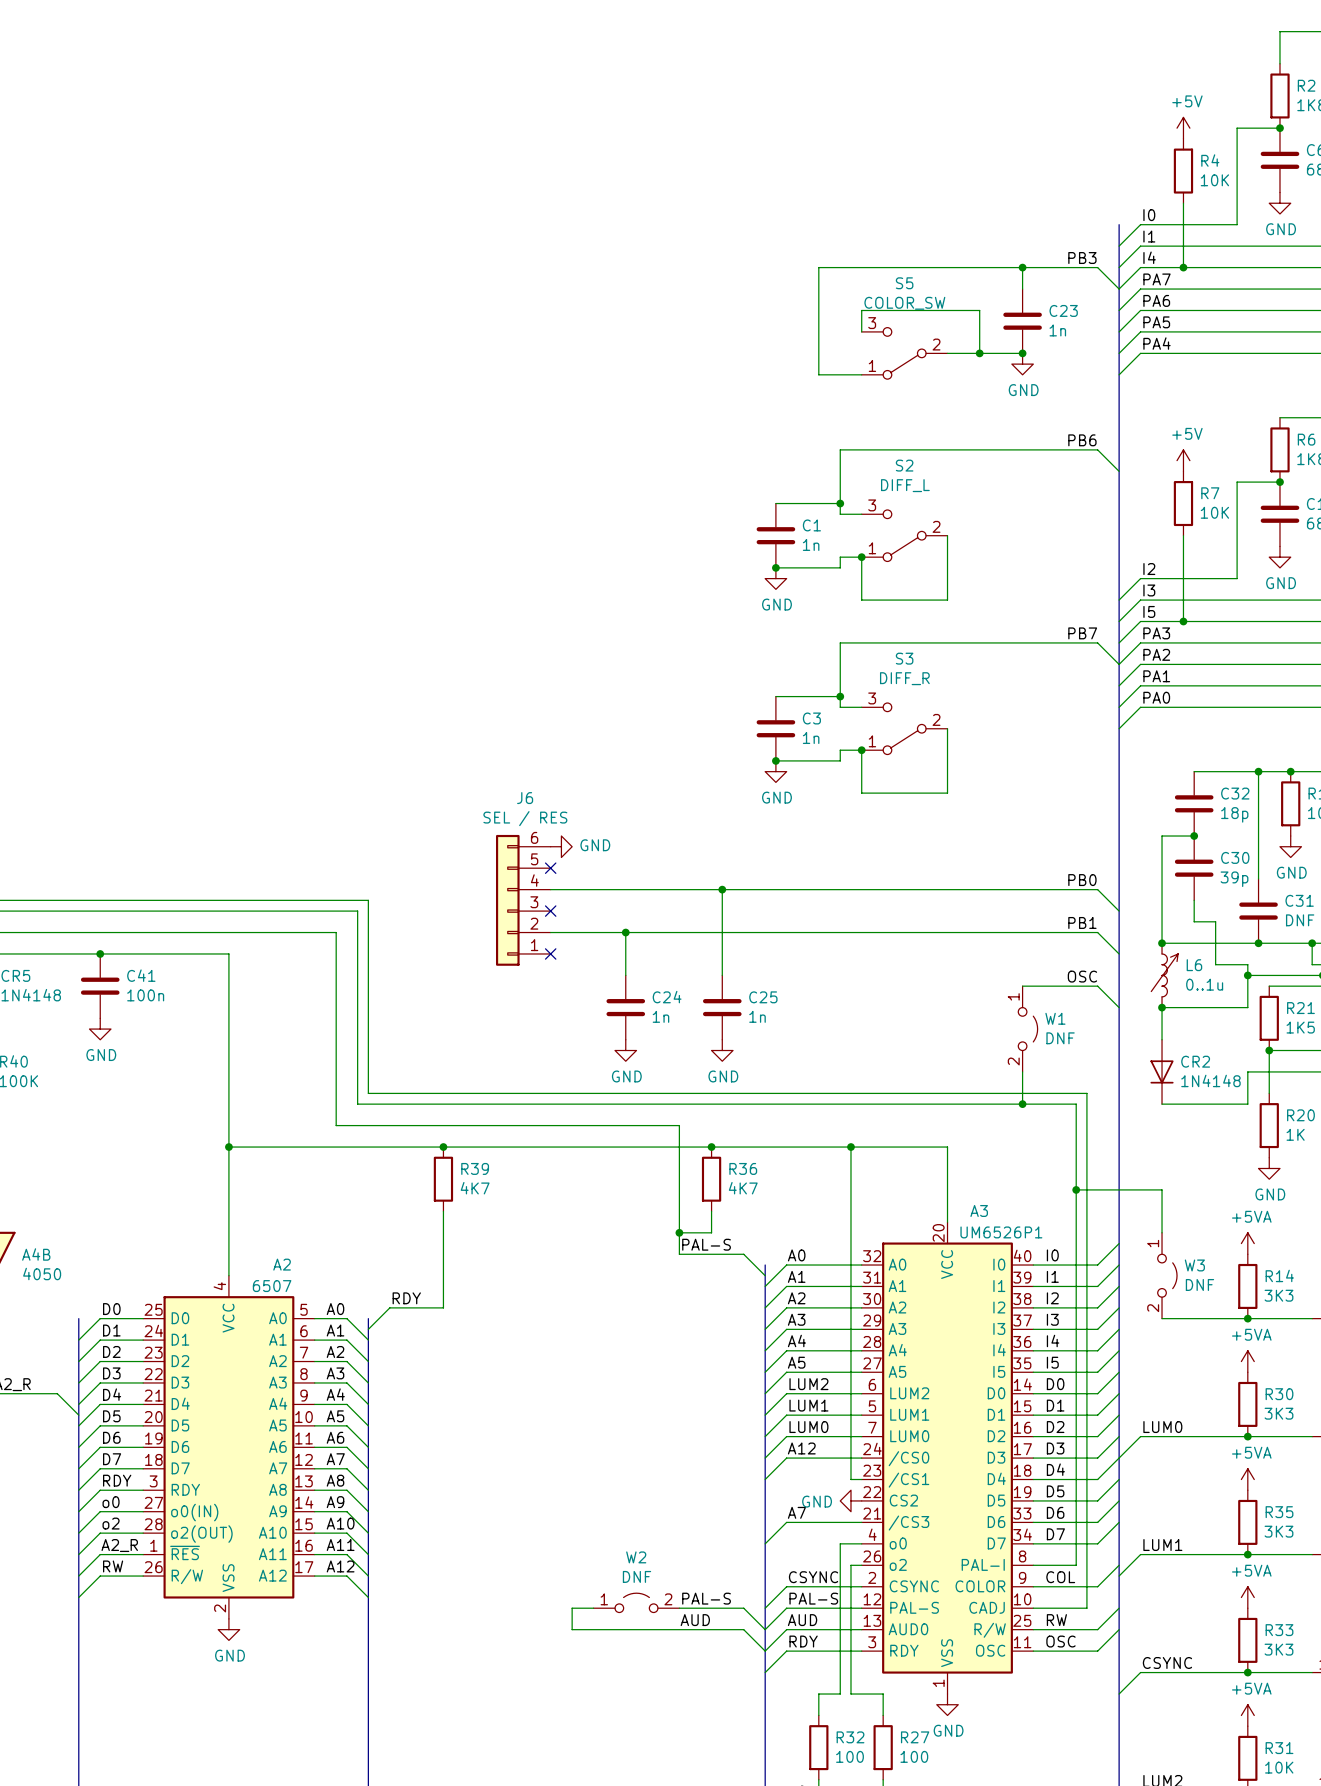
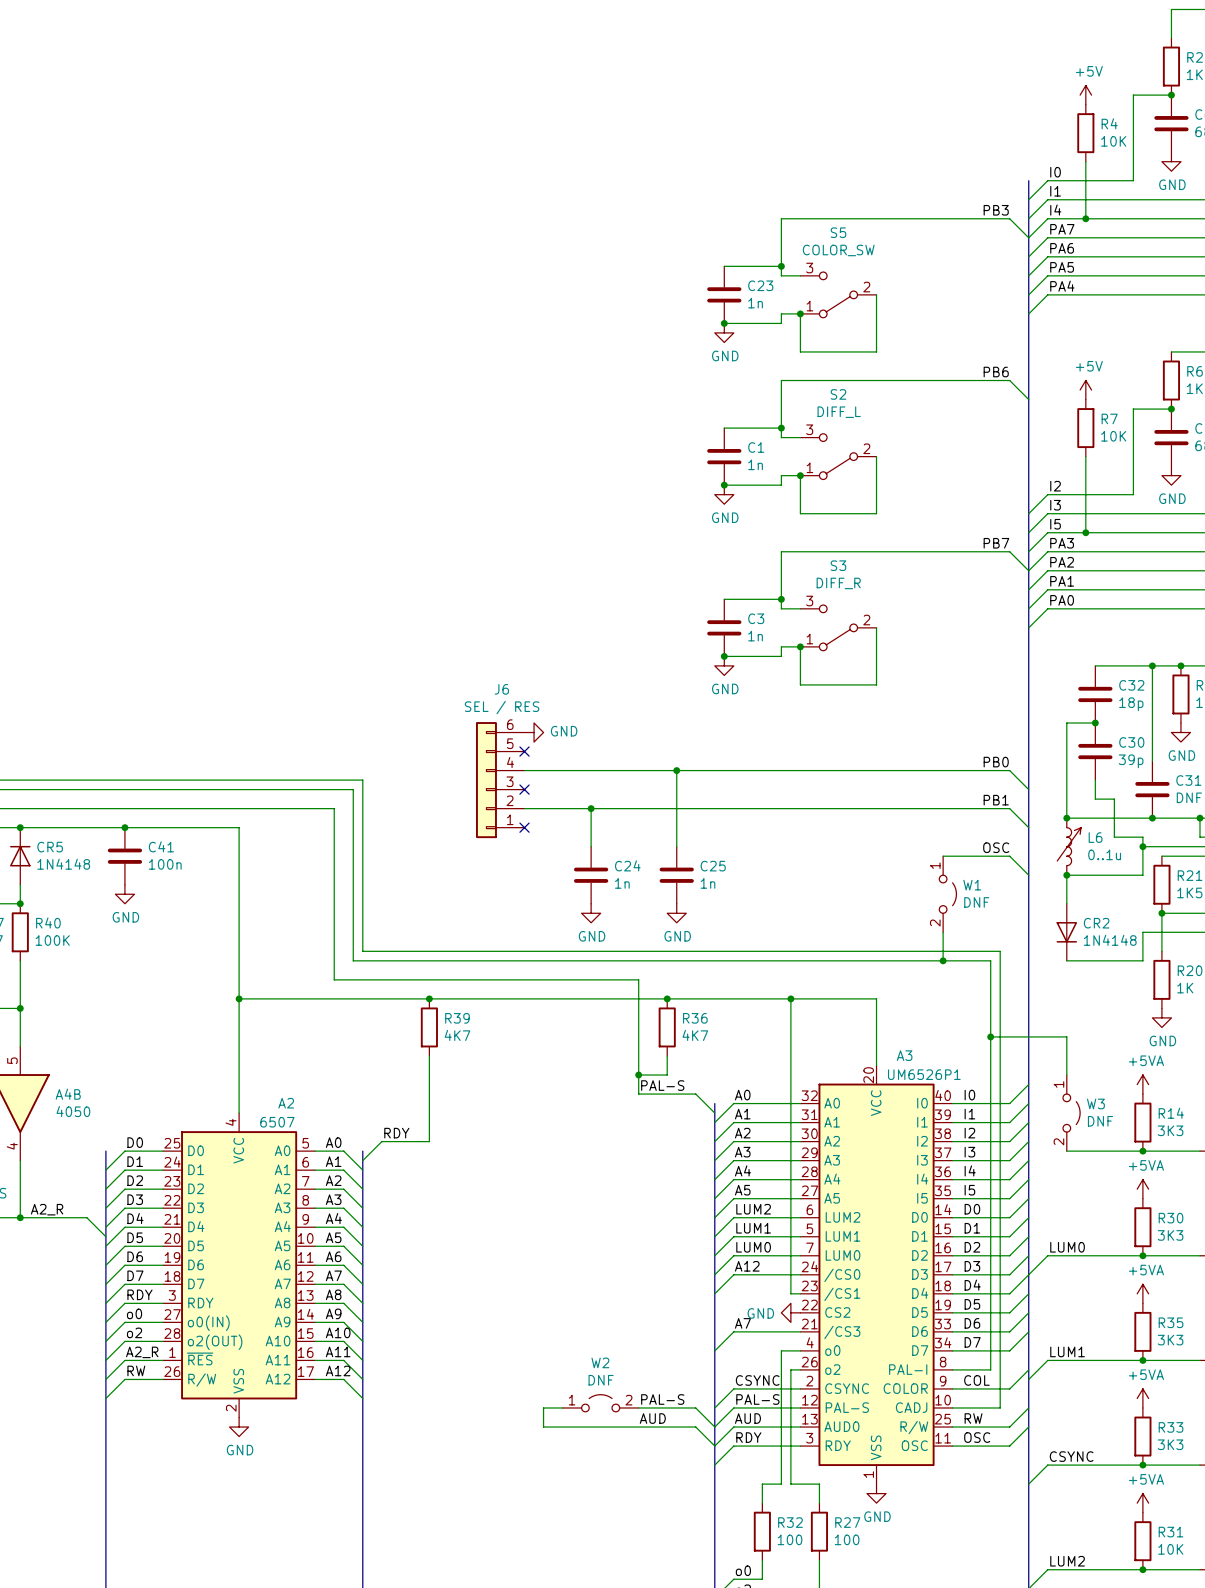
wire: (840, 267) (818, 267) (818, 374) (840, 374) -> (781, 218) (781, 275) (800, 275)
wire: (1022, 267) (1022, 289) -> none
junction: (1022, 267) -> none
wire: none -> (724, 266) (781, 266)
junction: none -> (781, 266)
C23 position: (1022, 321) -> (724, 294)
wire: (861, 331) (861, 310) (979, 310) (979, 353) -> none
wire: (947, 353) (1022, 353) -> (876, 294) (876, 351) (800, 351) (800, 313)
junction: (979, 353) -> none
junction: (1022, 353) -> none
power symbol: GND (1022, 364) -> none
wire: none -> (781, 313) (781, 323) (724, 323)
junction: none -> (800, 313)
junction: none -> (724, 323)
power symbol: none -> GND (724, 332)

